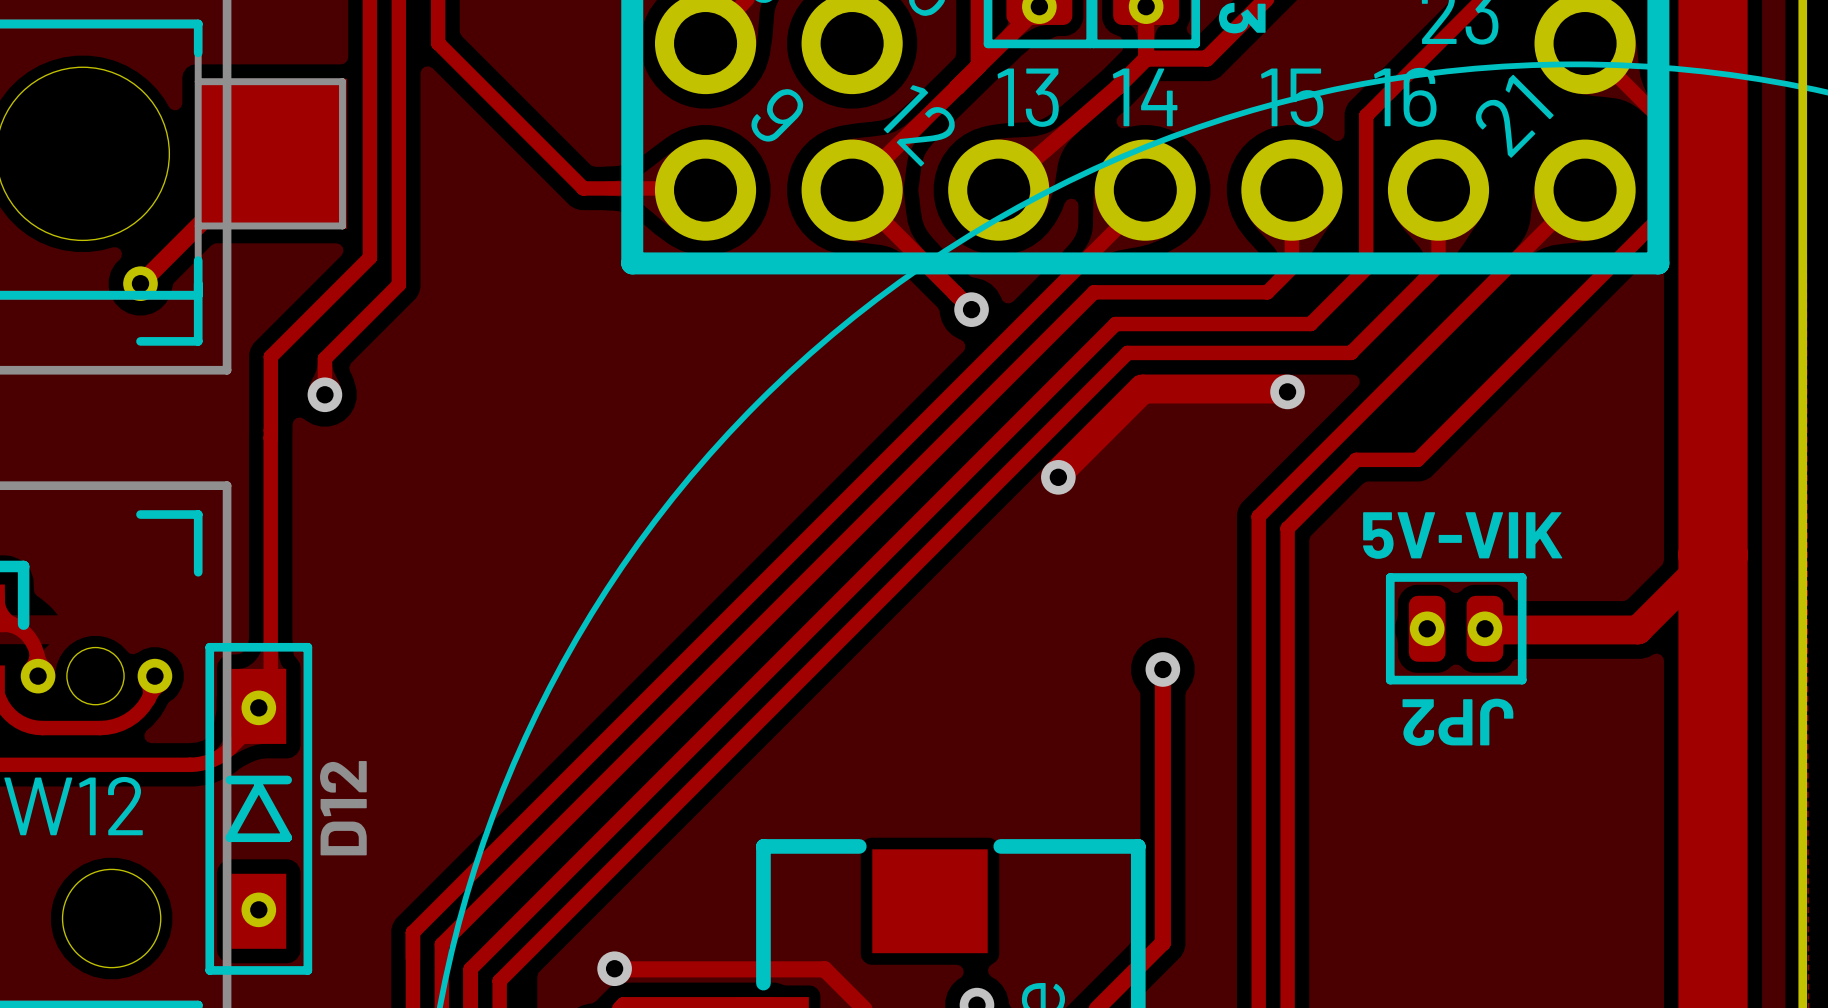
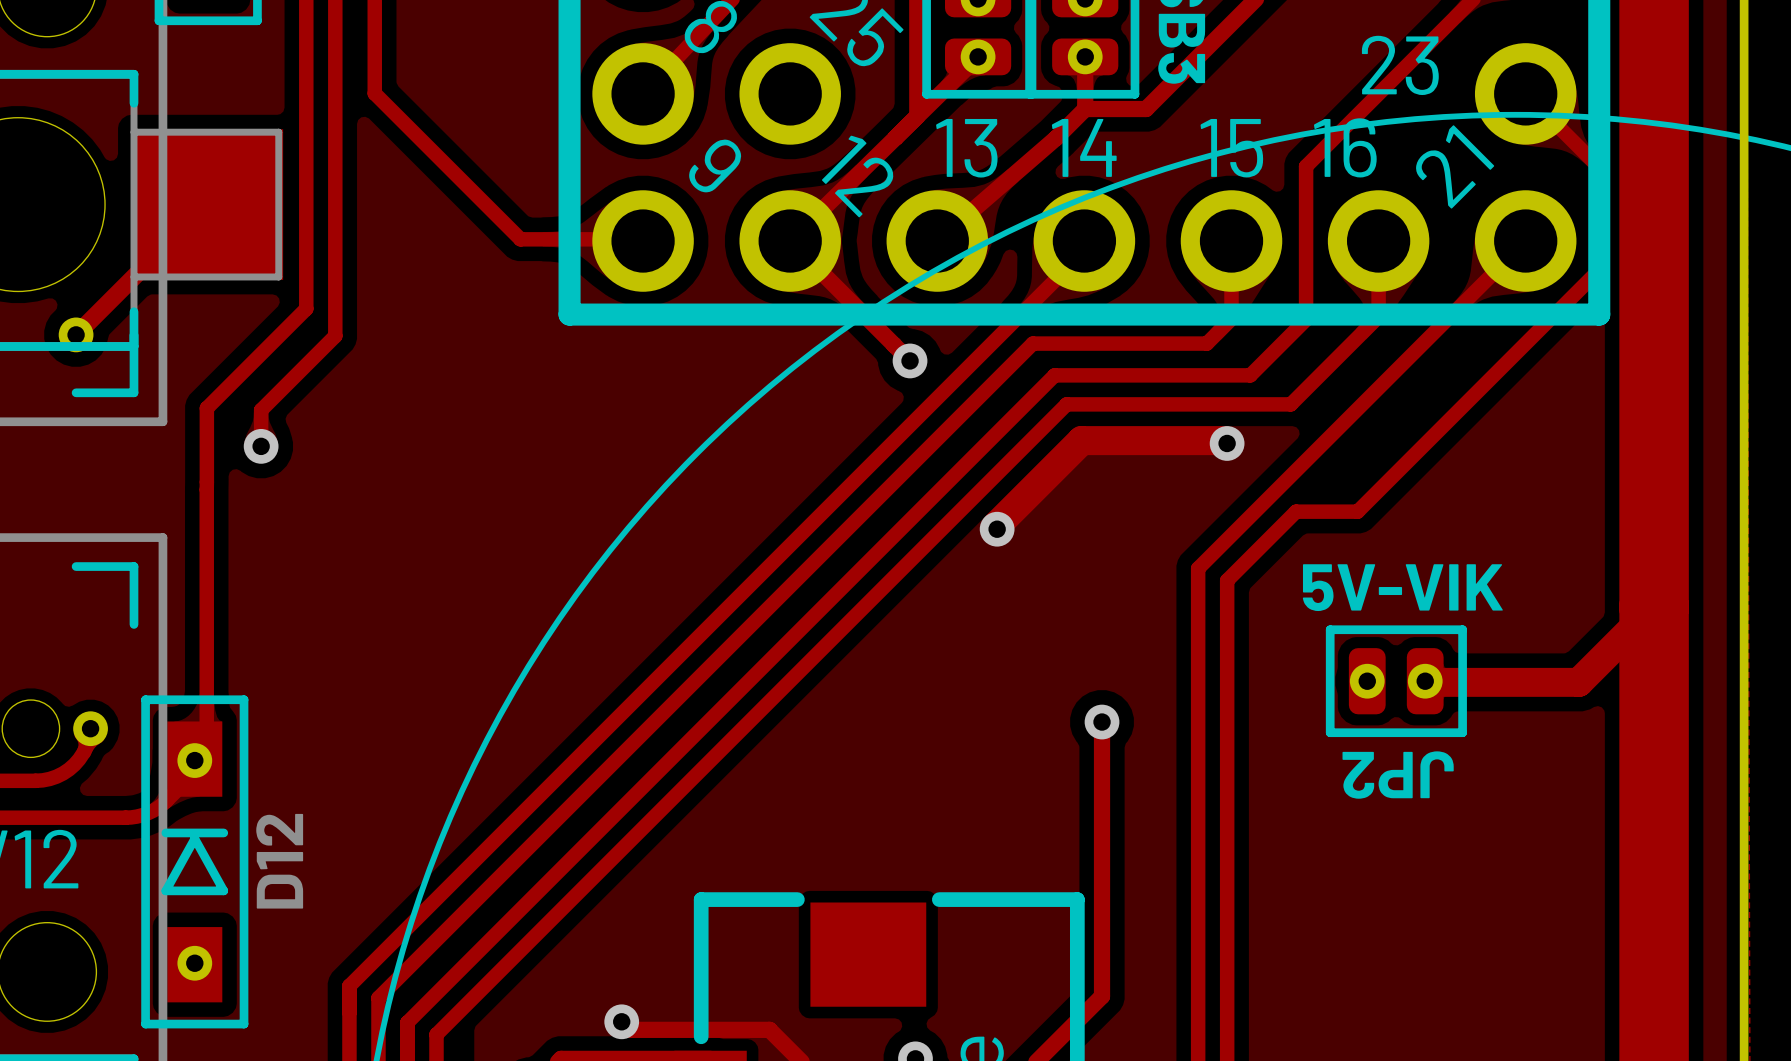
via position: (614, 968) -> (621, 1021)
track: (615, 969) (824, 969) (831, 976) -> (621, 1021) (629, 1029) (769, 1029)

